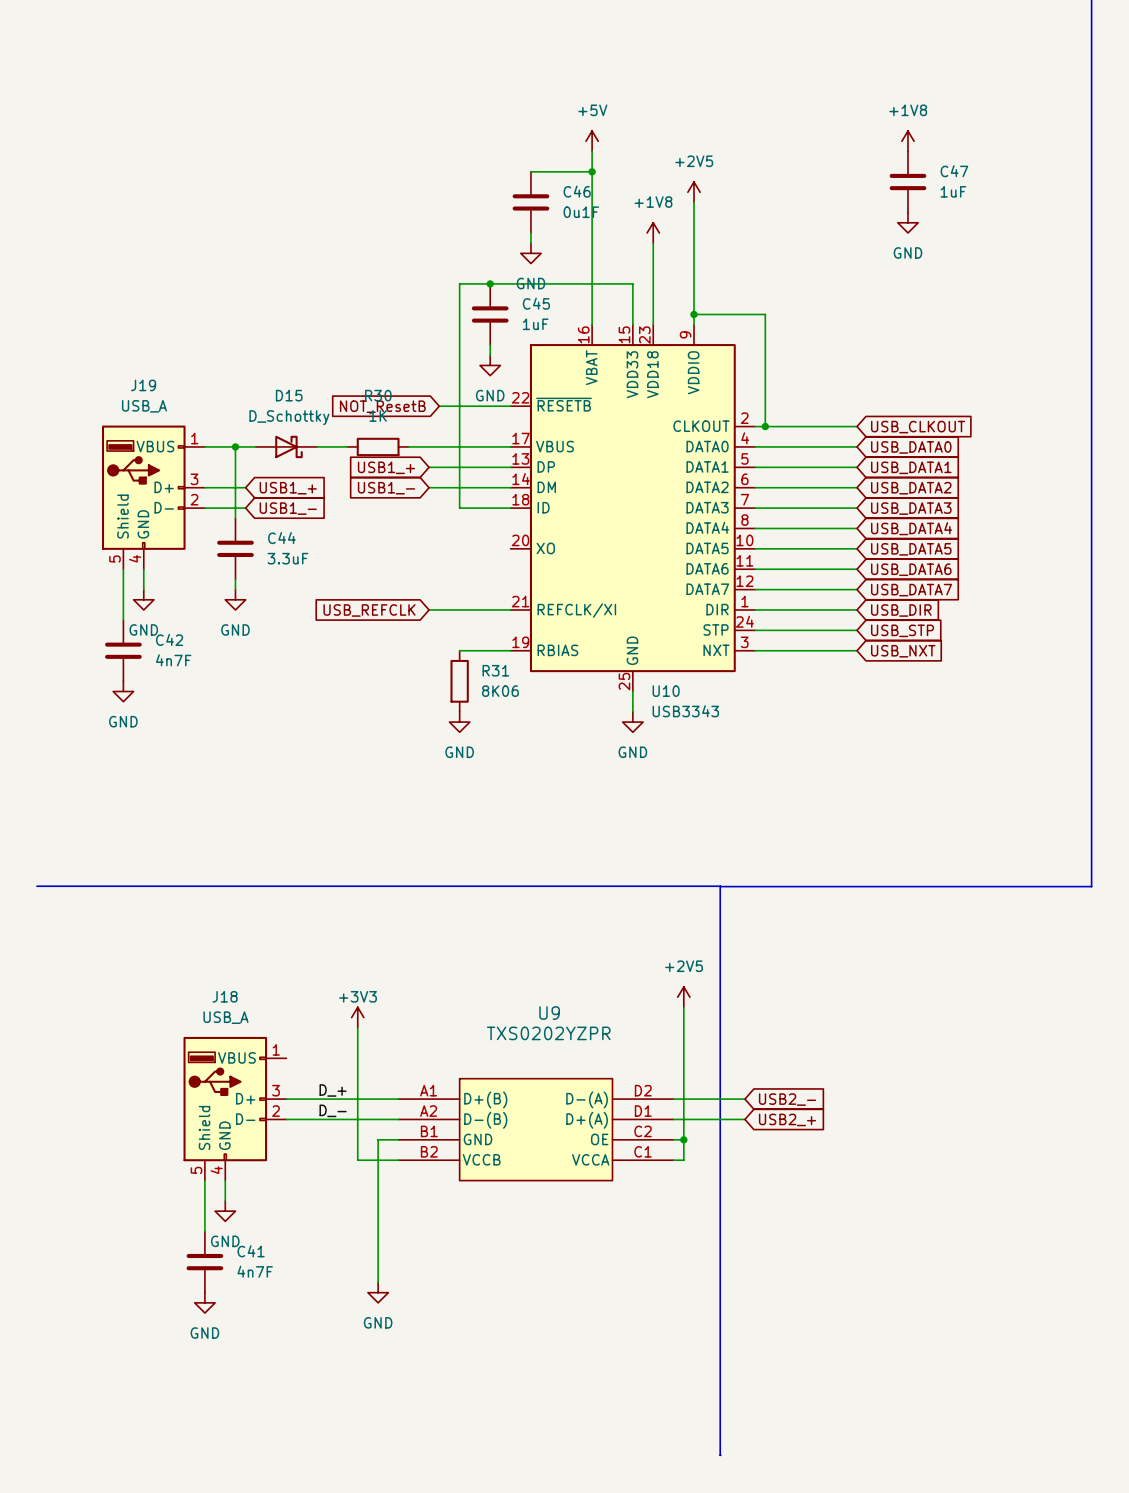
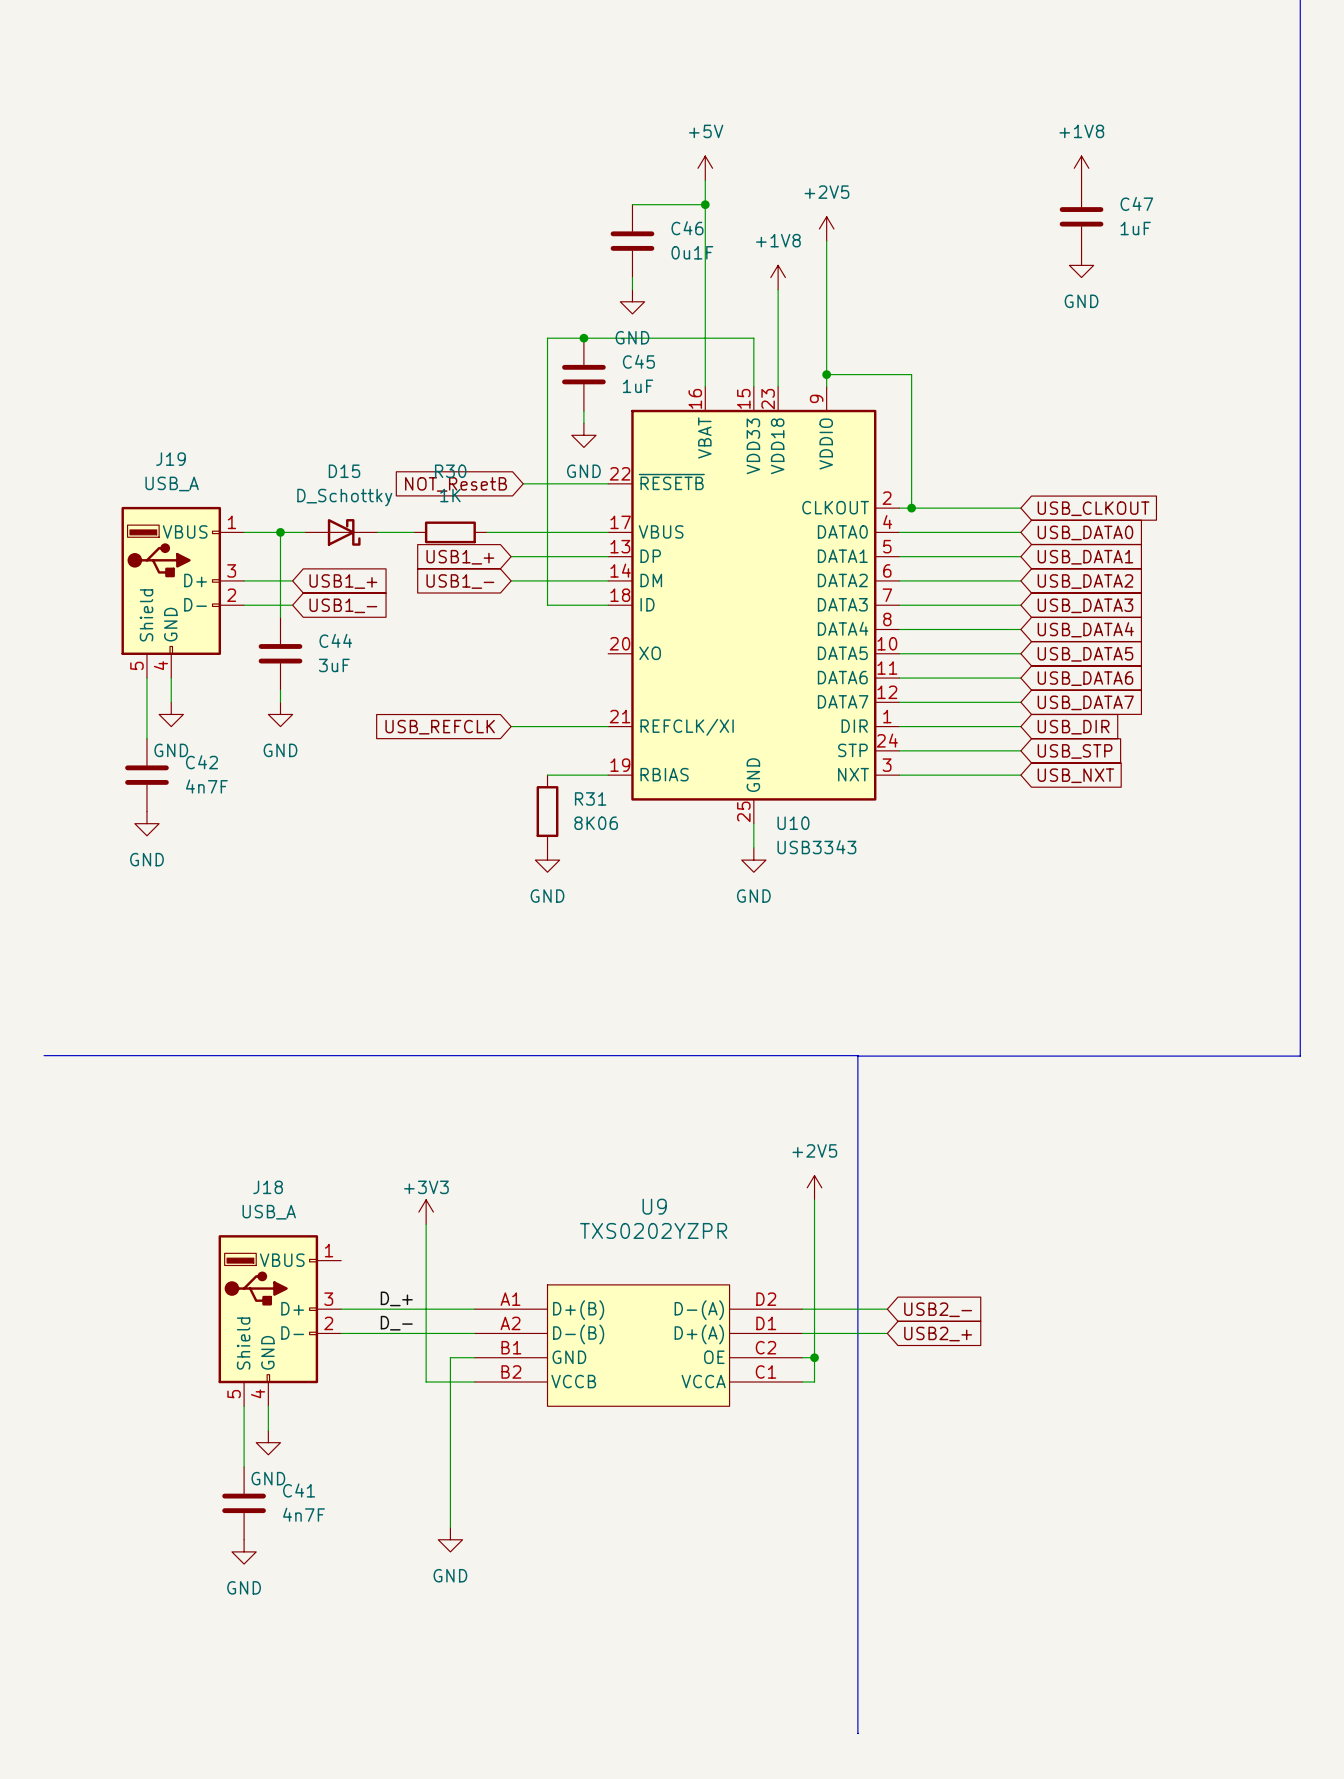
C44 value: 3.3uF (287, 558) -> 3uF (334, 665)

